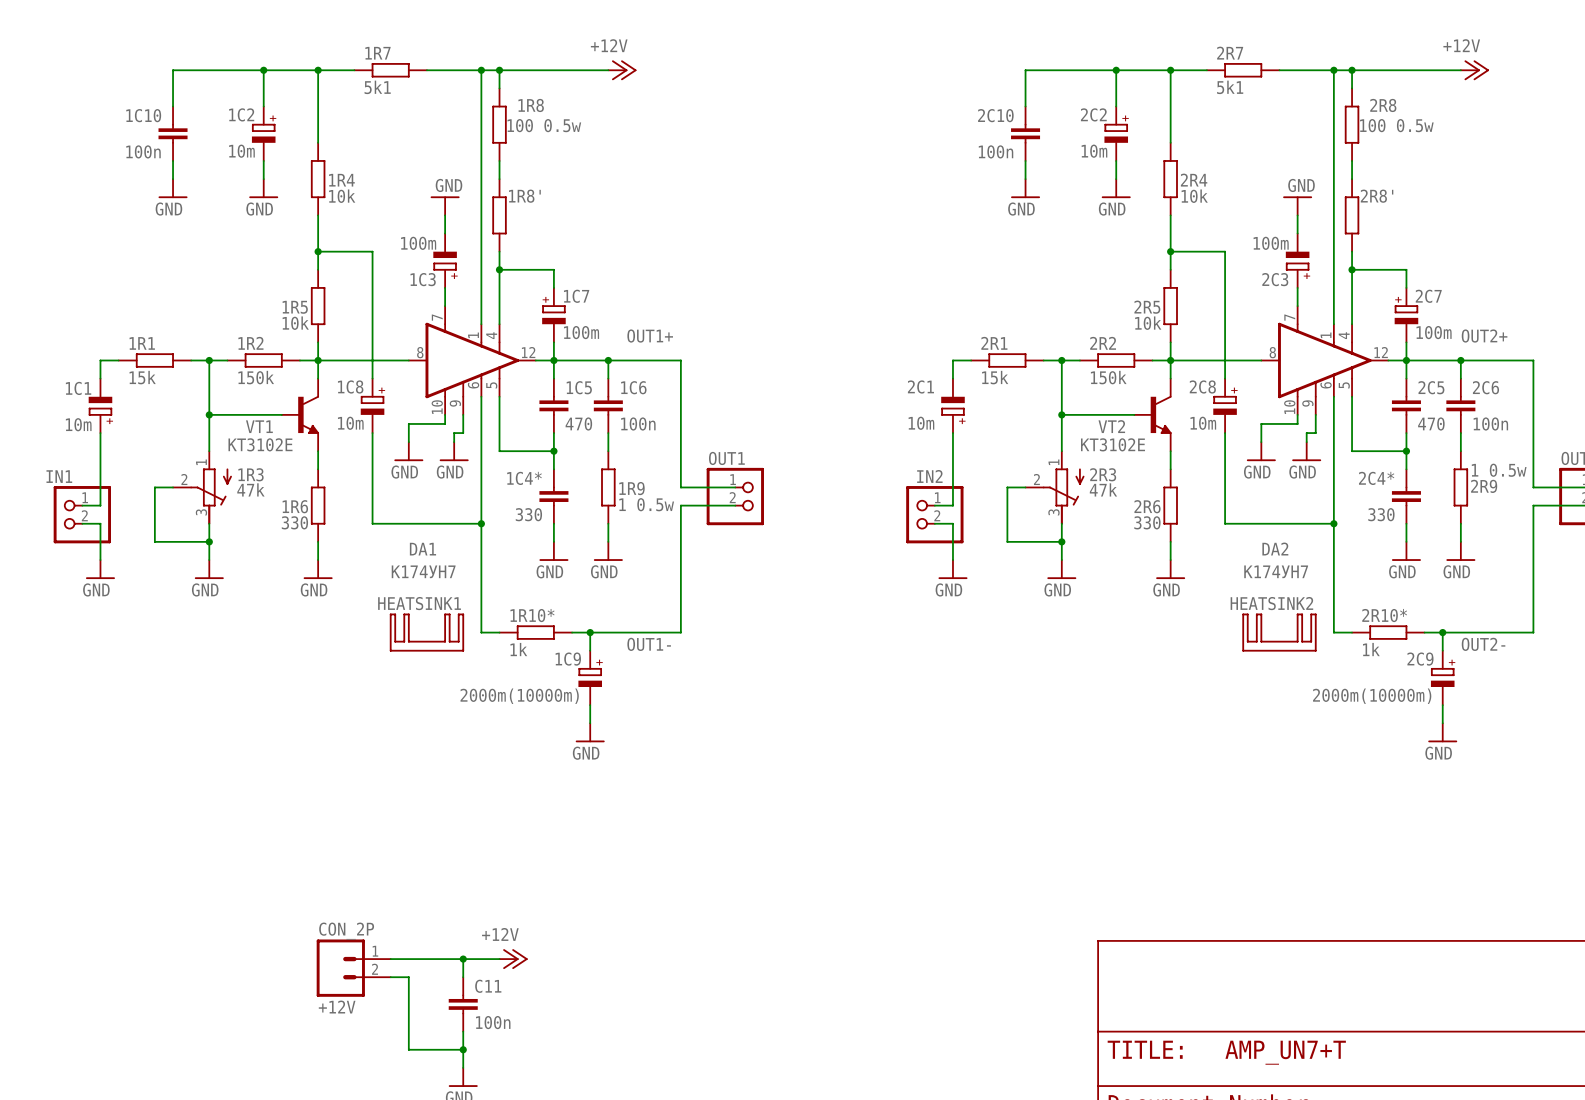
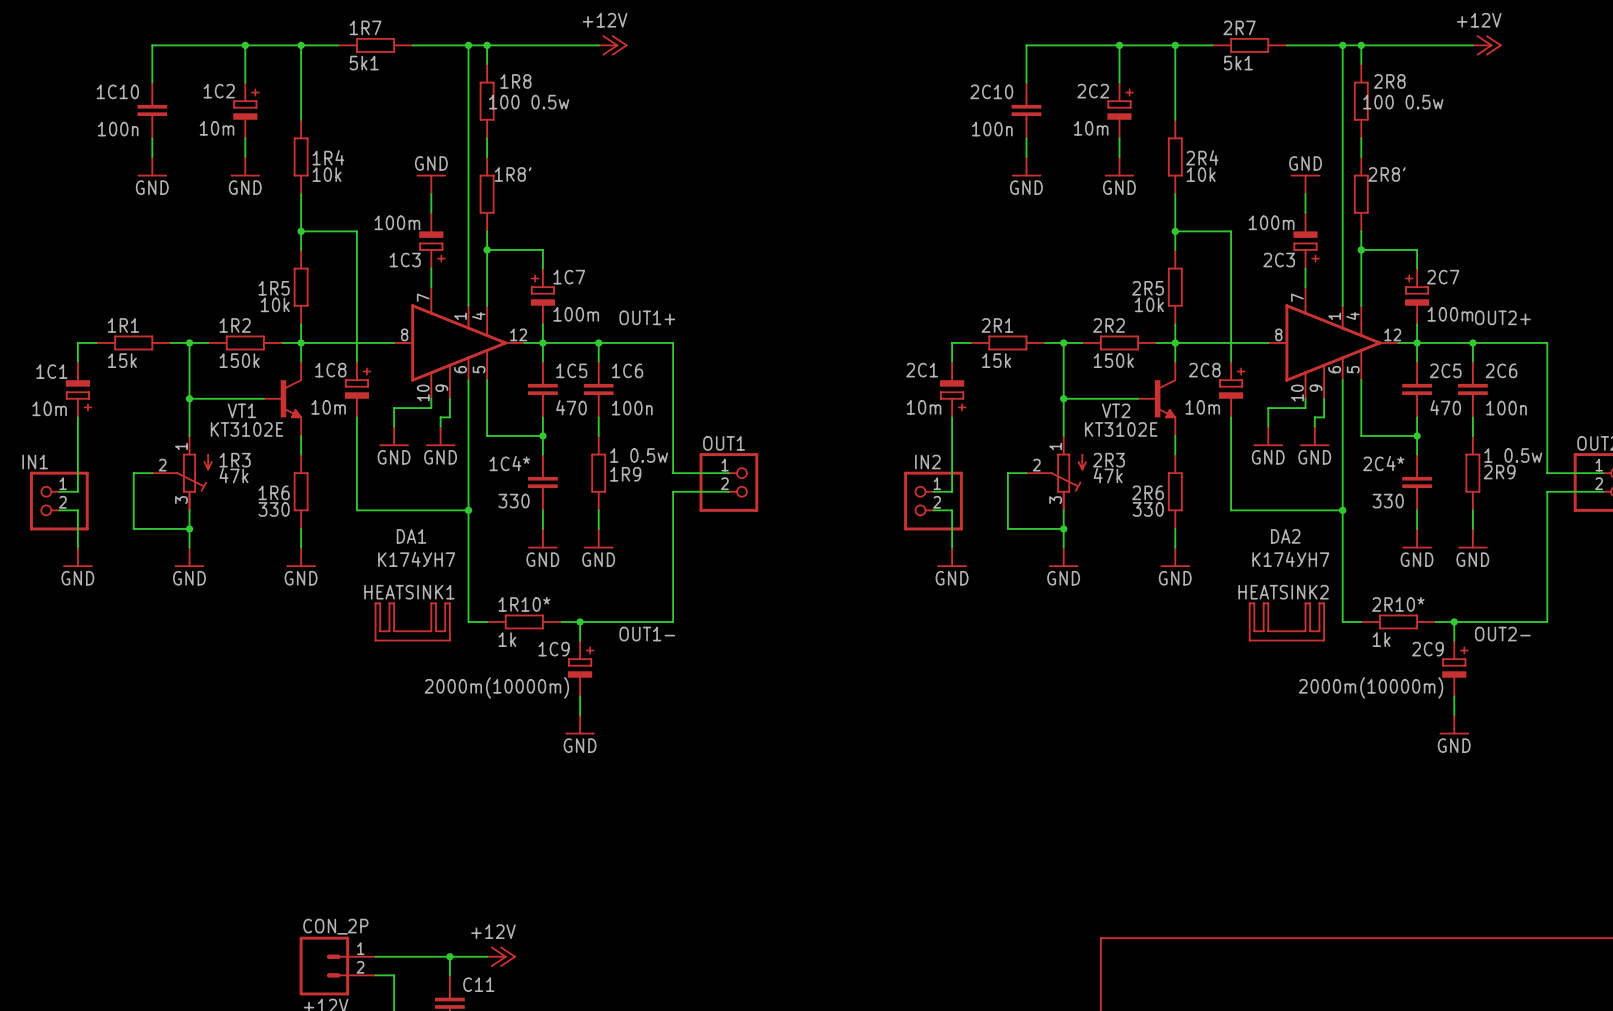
1R9 value position: 1 0.5w (646, 504) -> 1 0.5w (639, 455)

